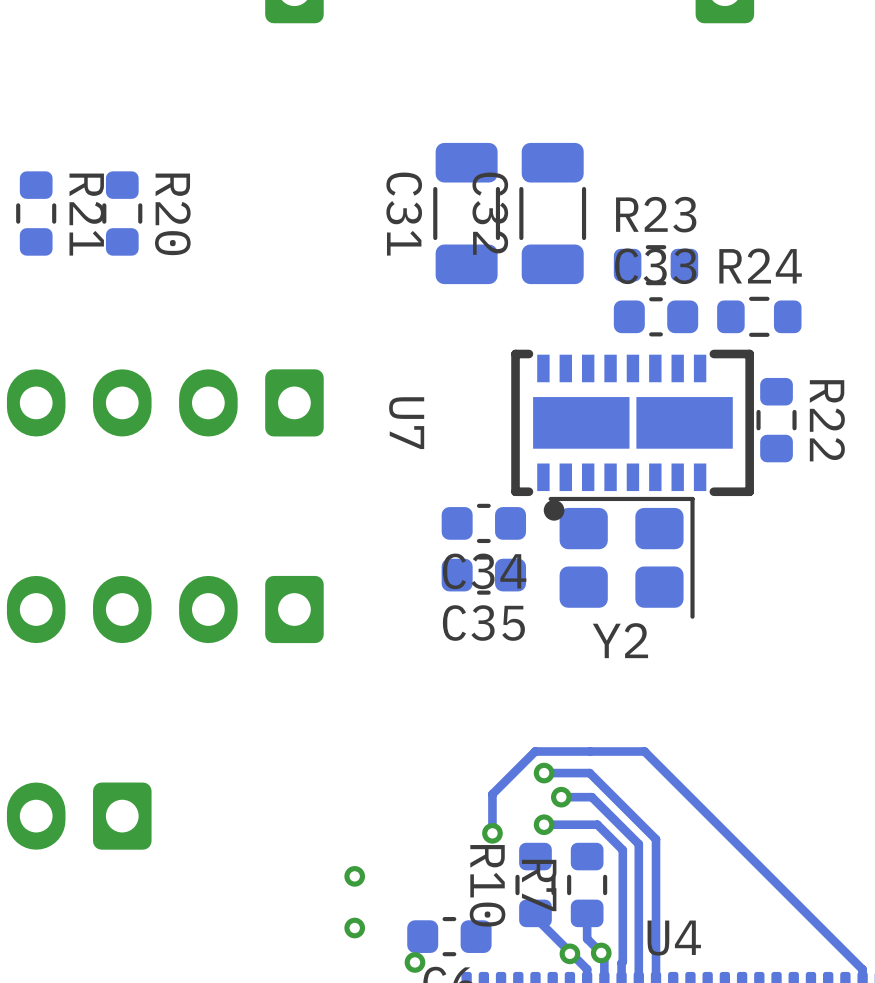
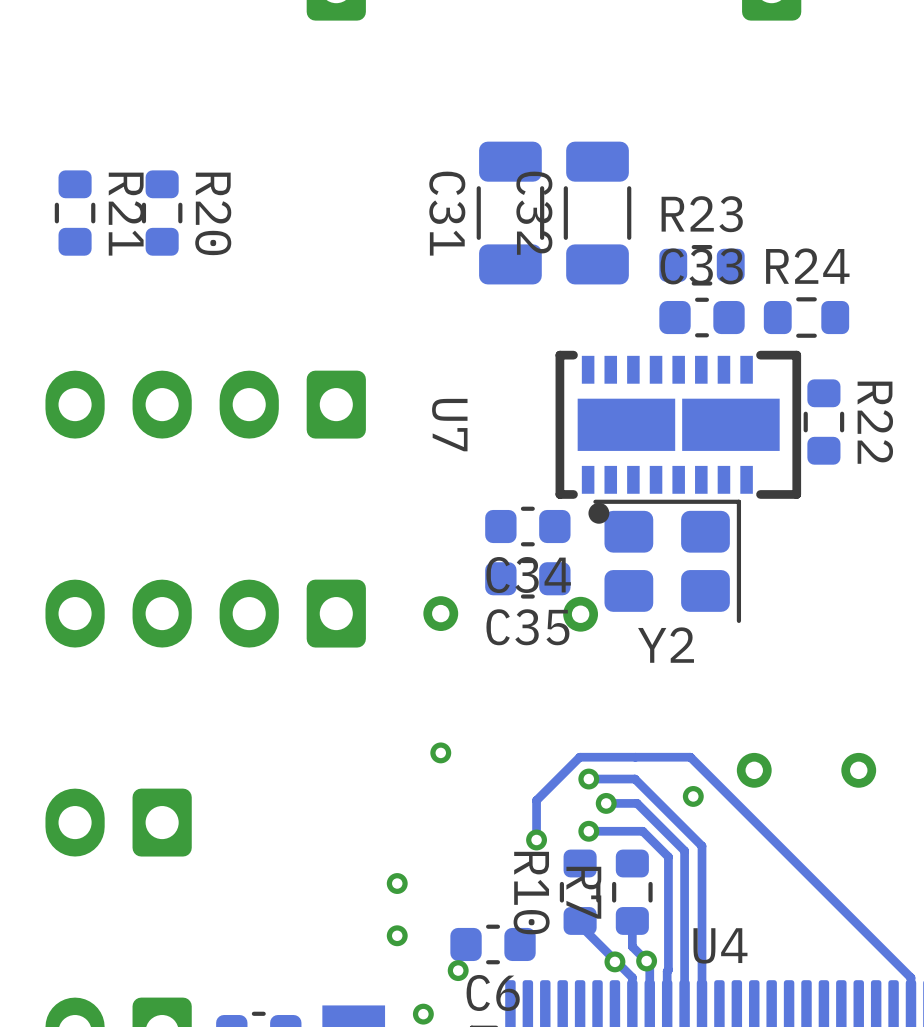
via: none -> (440, 613)
via: none -> (580, 614)
via: none -> (440, 752)
via: none -> (754, 770)
via: none -> (858, 770)
via: none -> (693, 796)

